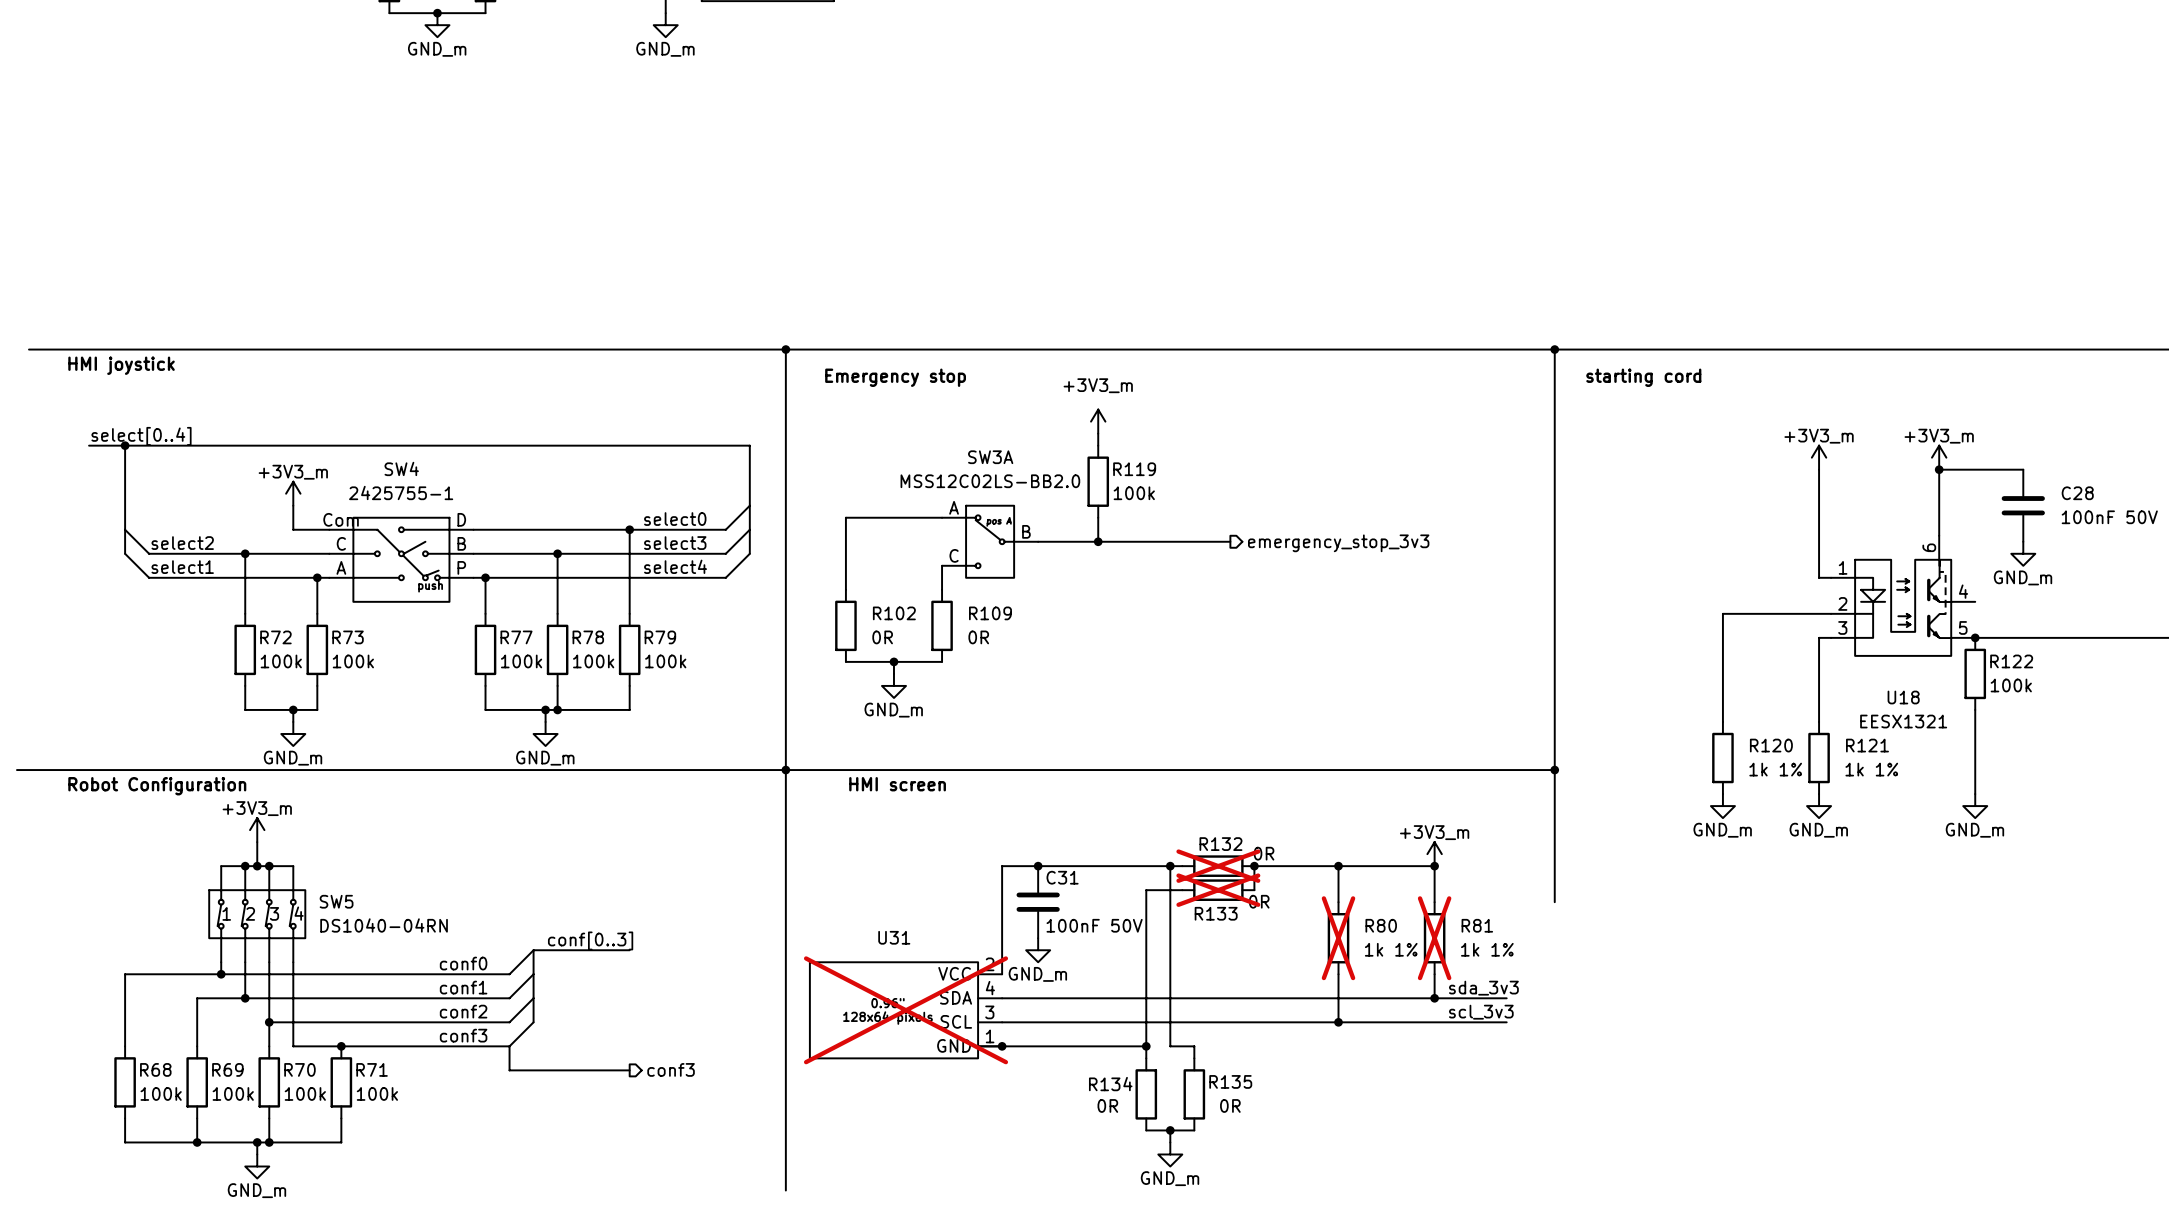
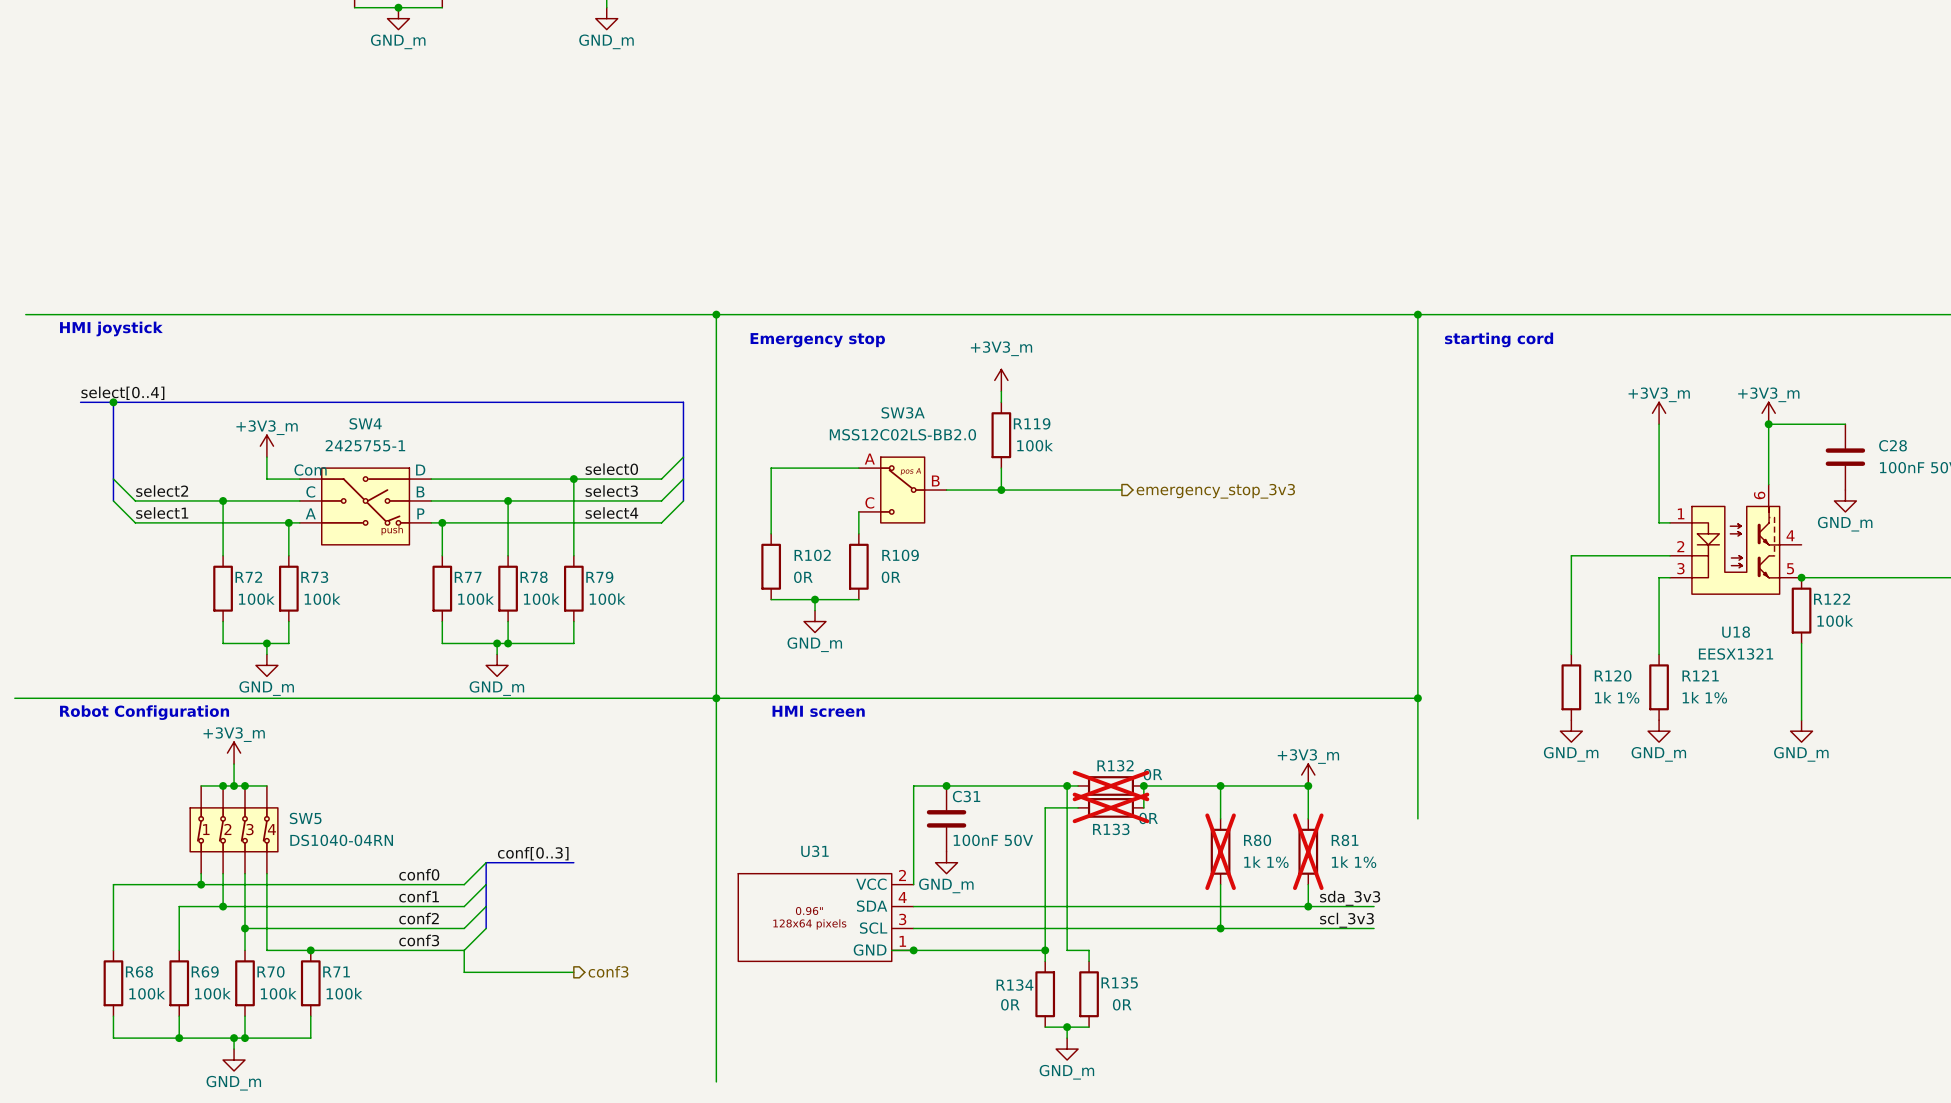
U31 do-not-place cross: (906, 1010) -> none

